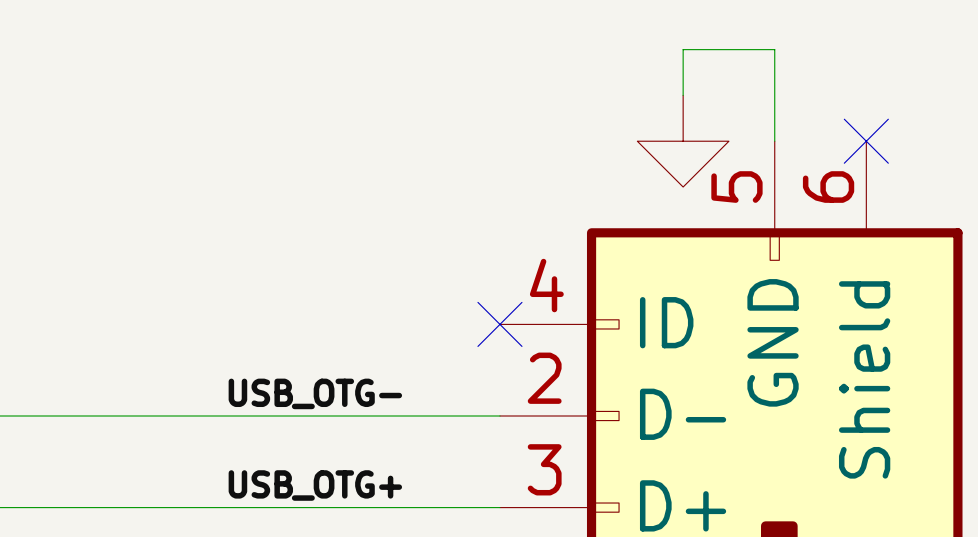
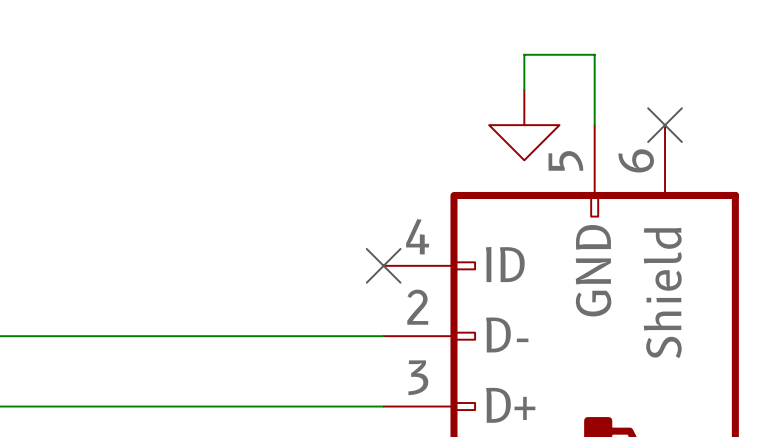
label: USB_OTG- (315, 393) -> none
label: USB_OTG+ (315, 485) -> none

